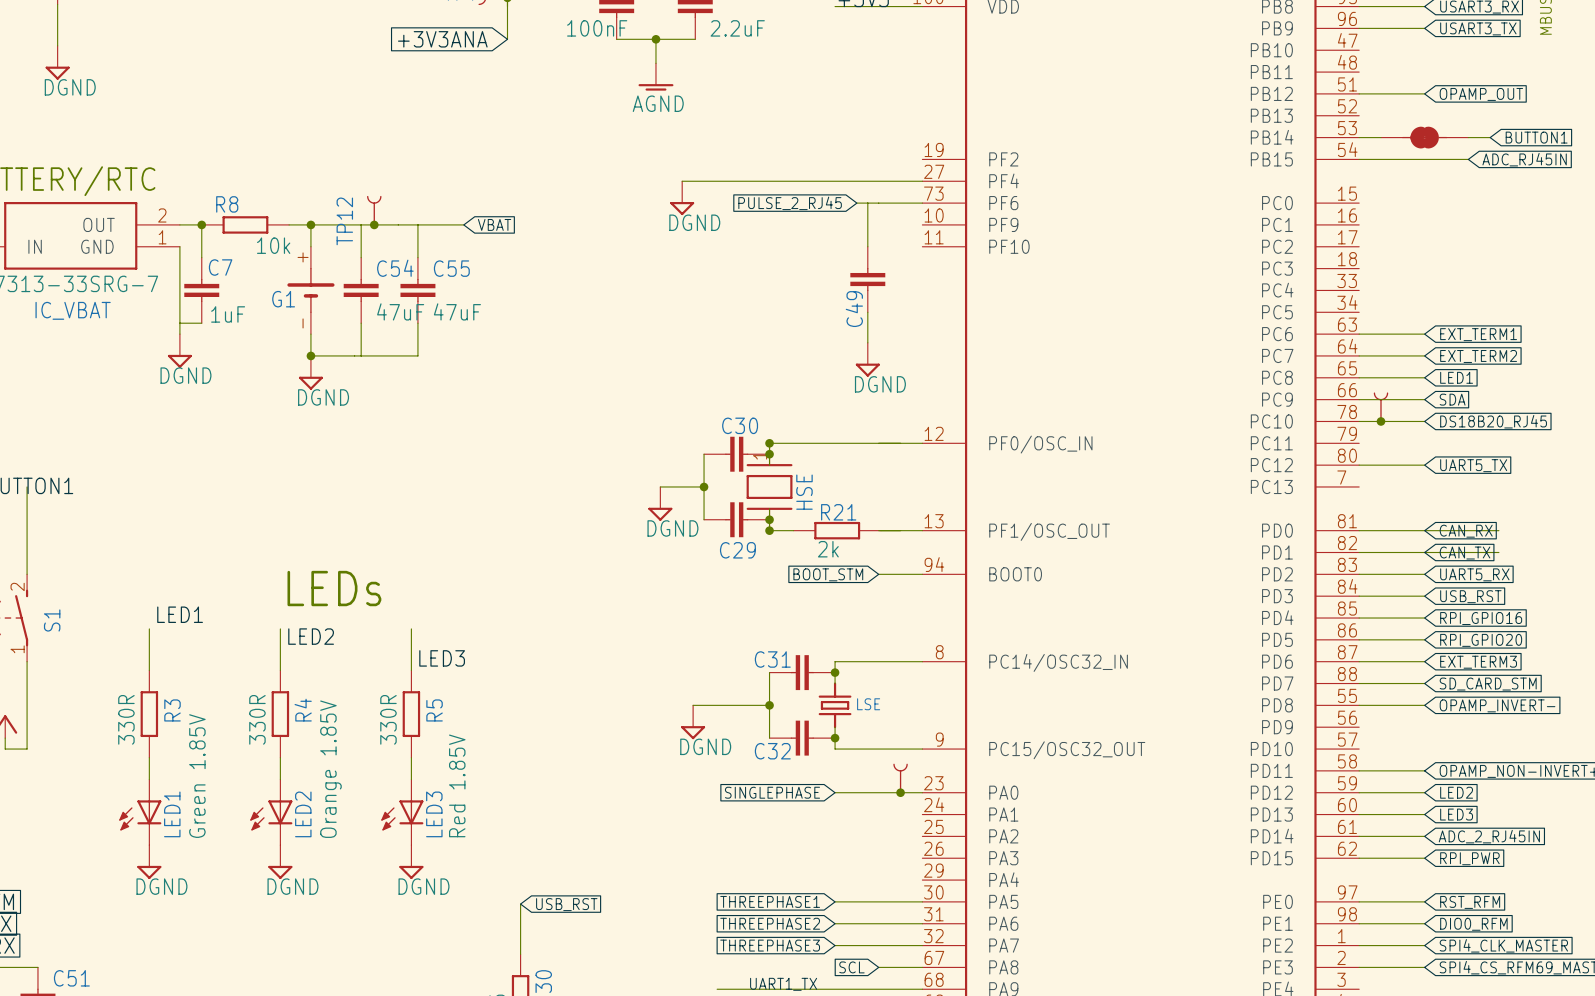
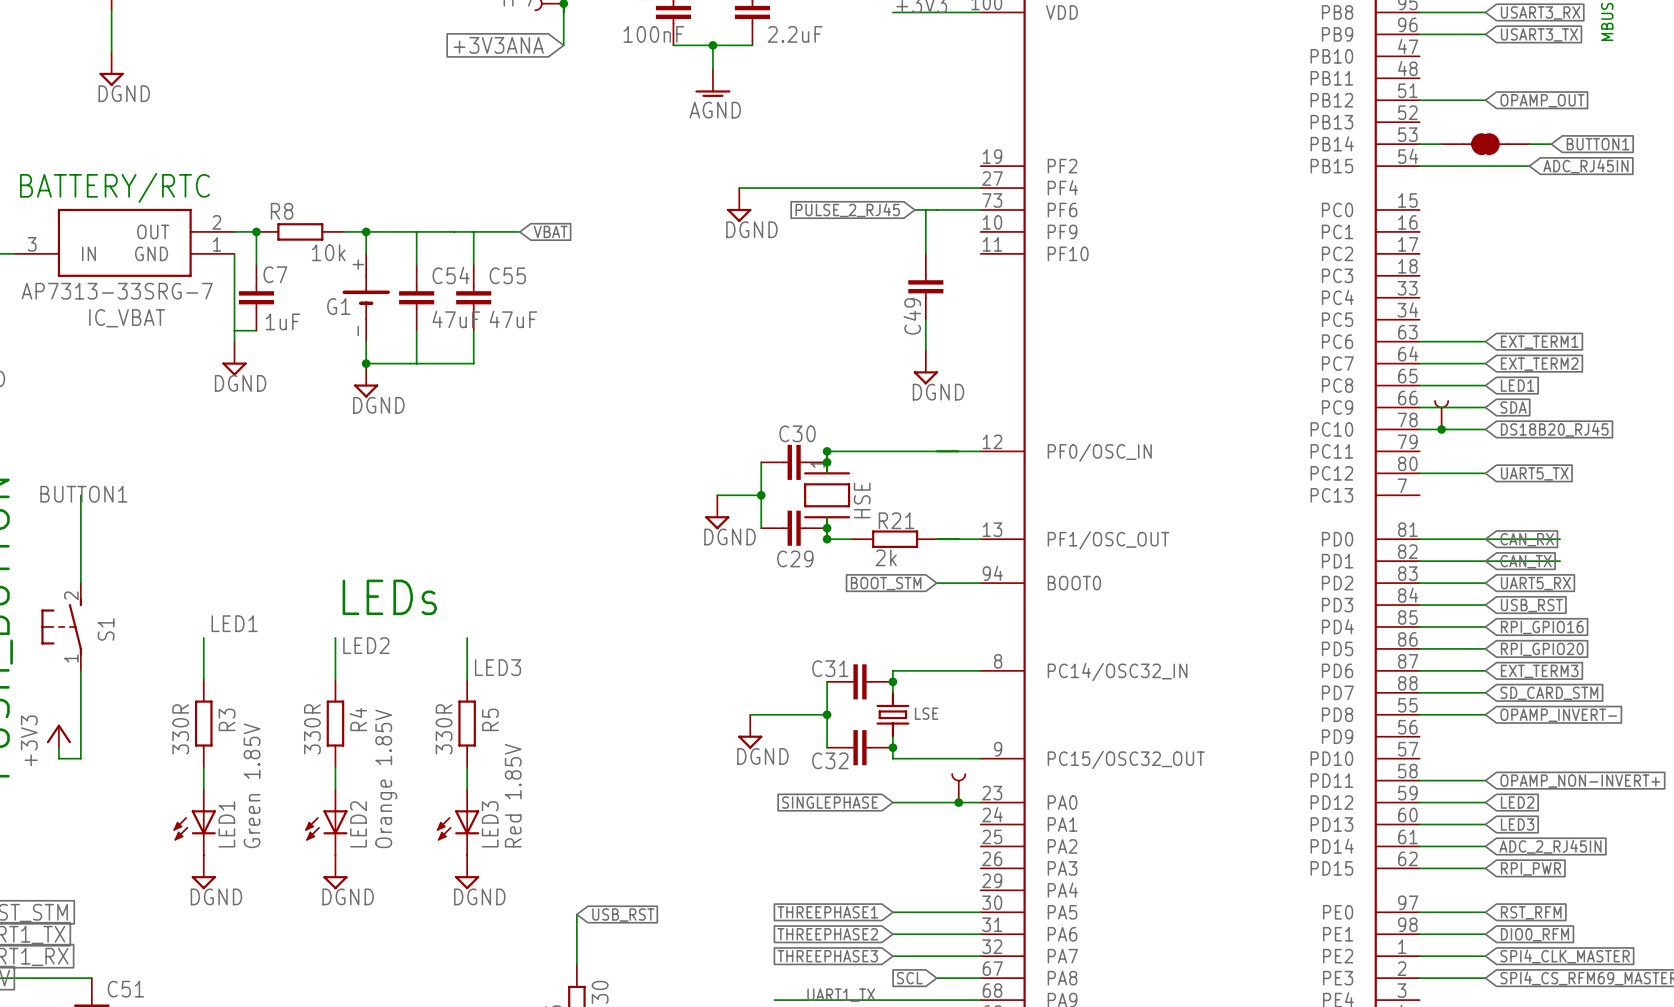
TP12: (374, 210) -> none
junction: (374, 224) -> none

